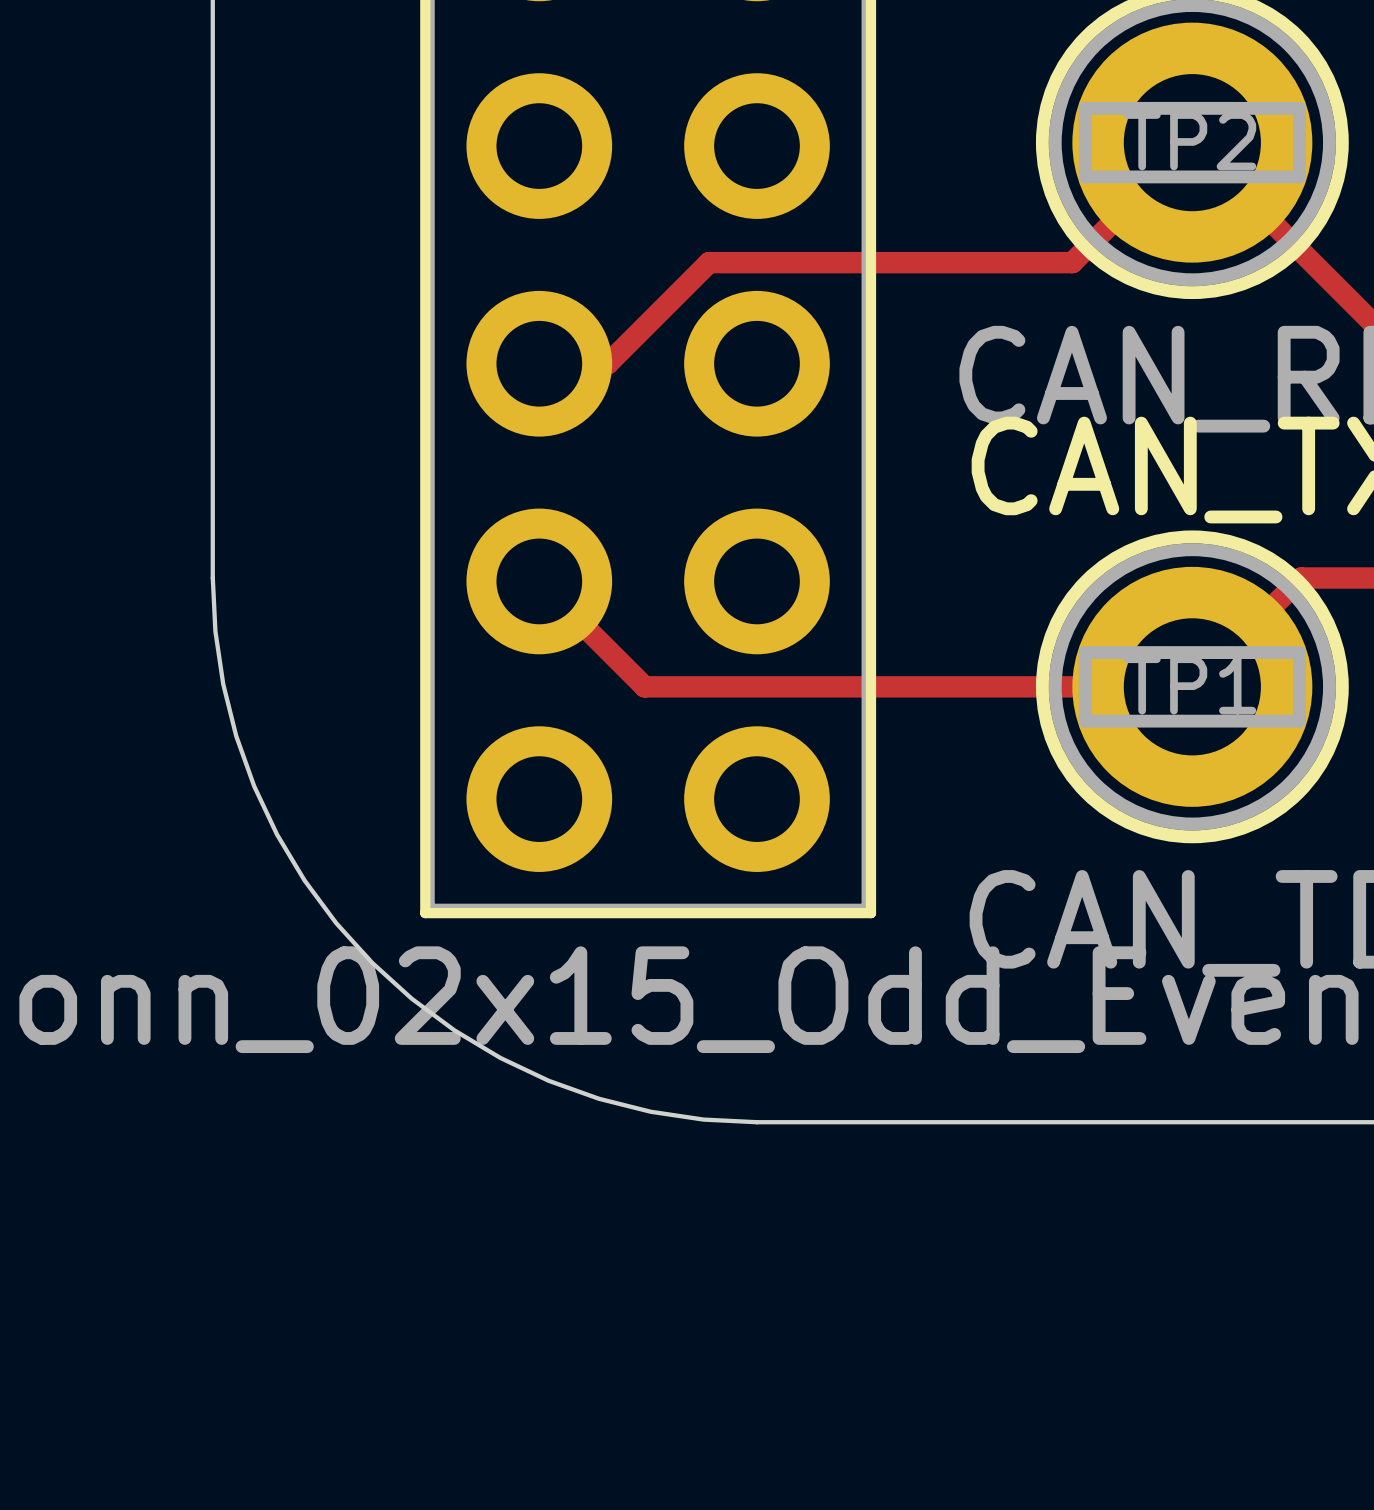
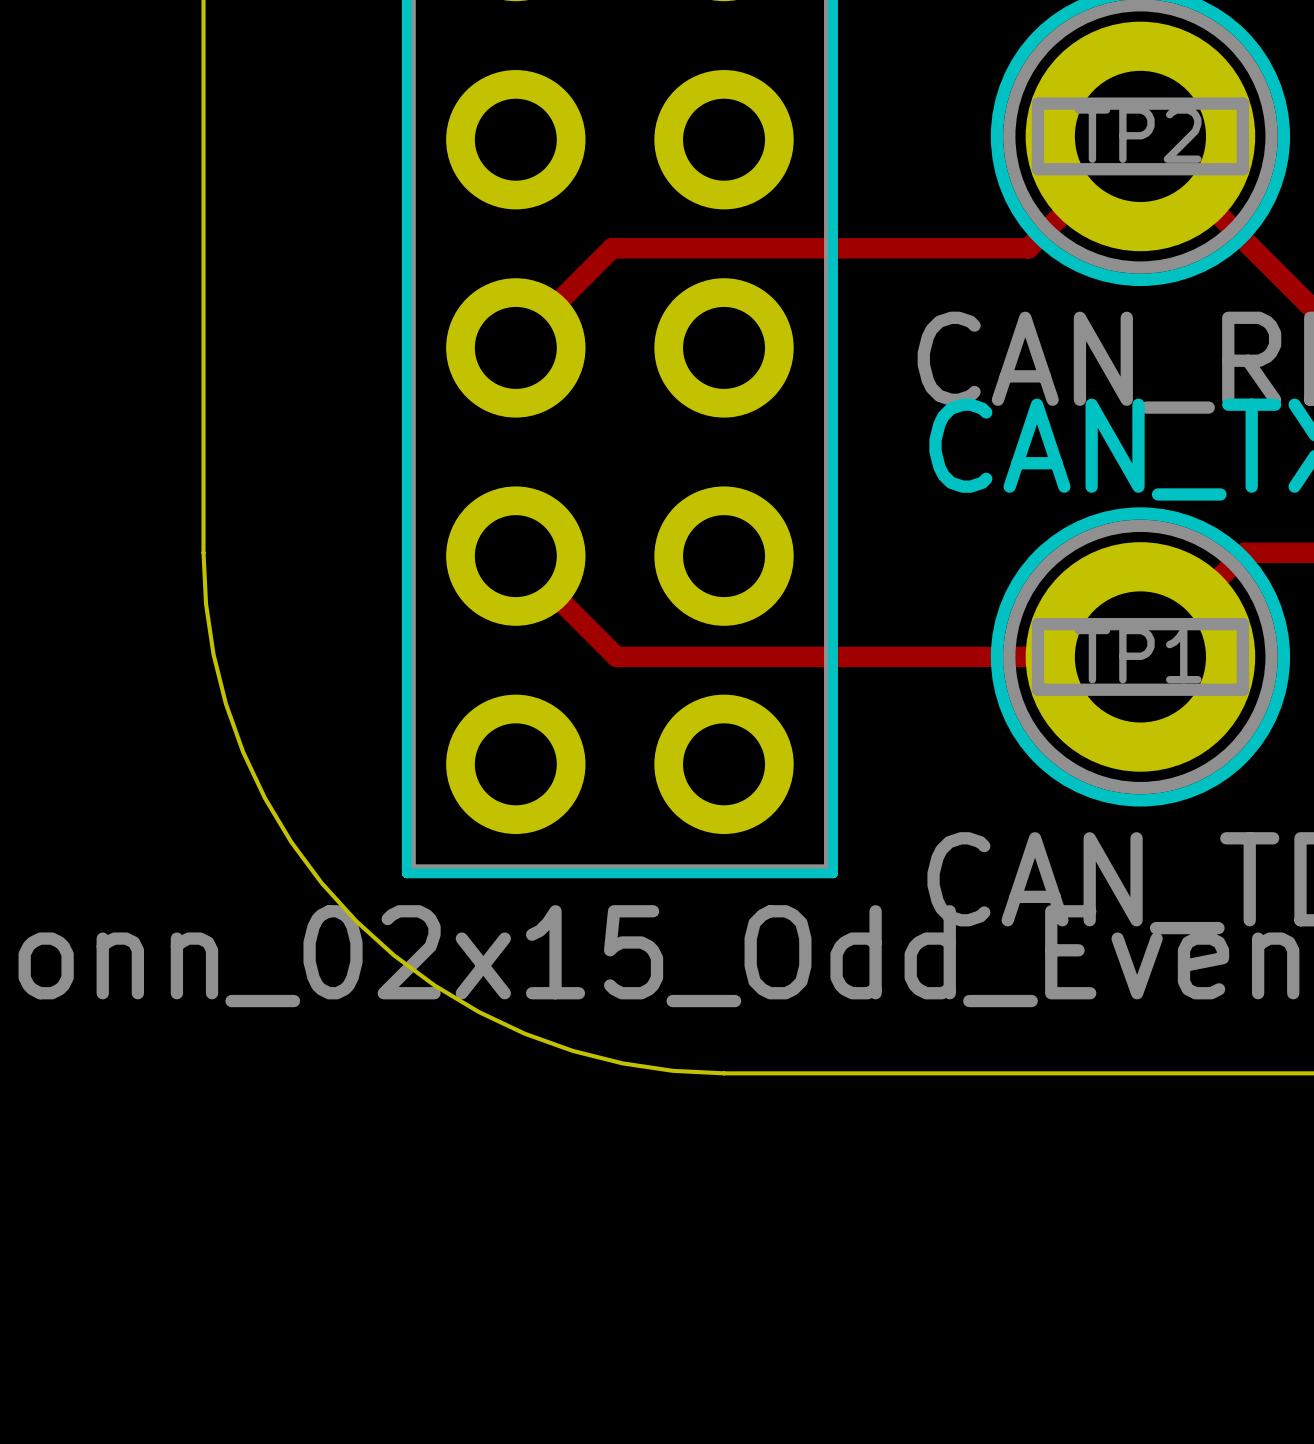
track: (1075, 259) (1072, 262) (709, 262) (607, 363) (539, 363) -> (1028, 248) (612, 248) (515, 344)

